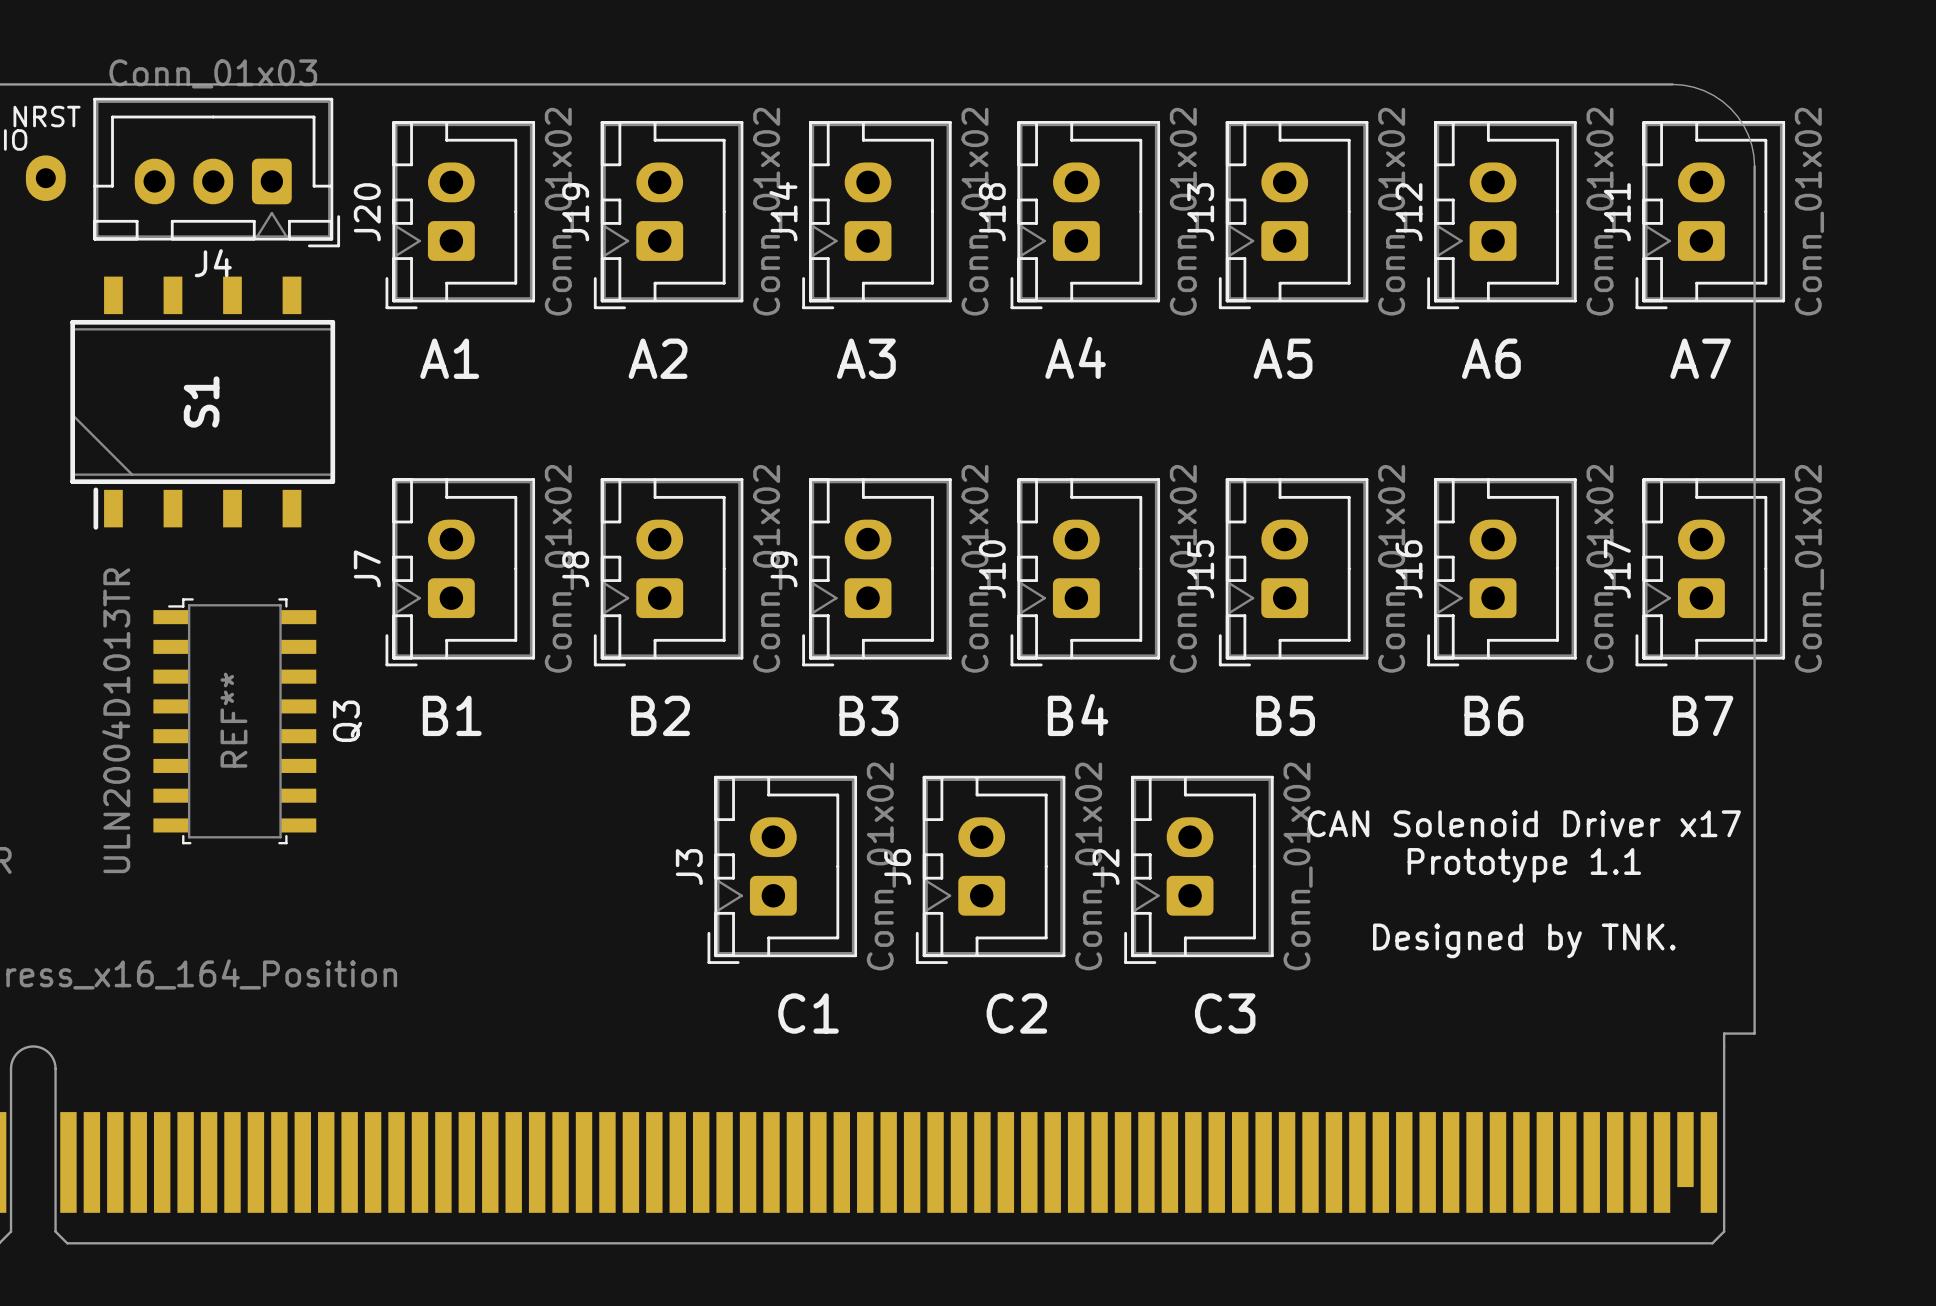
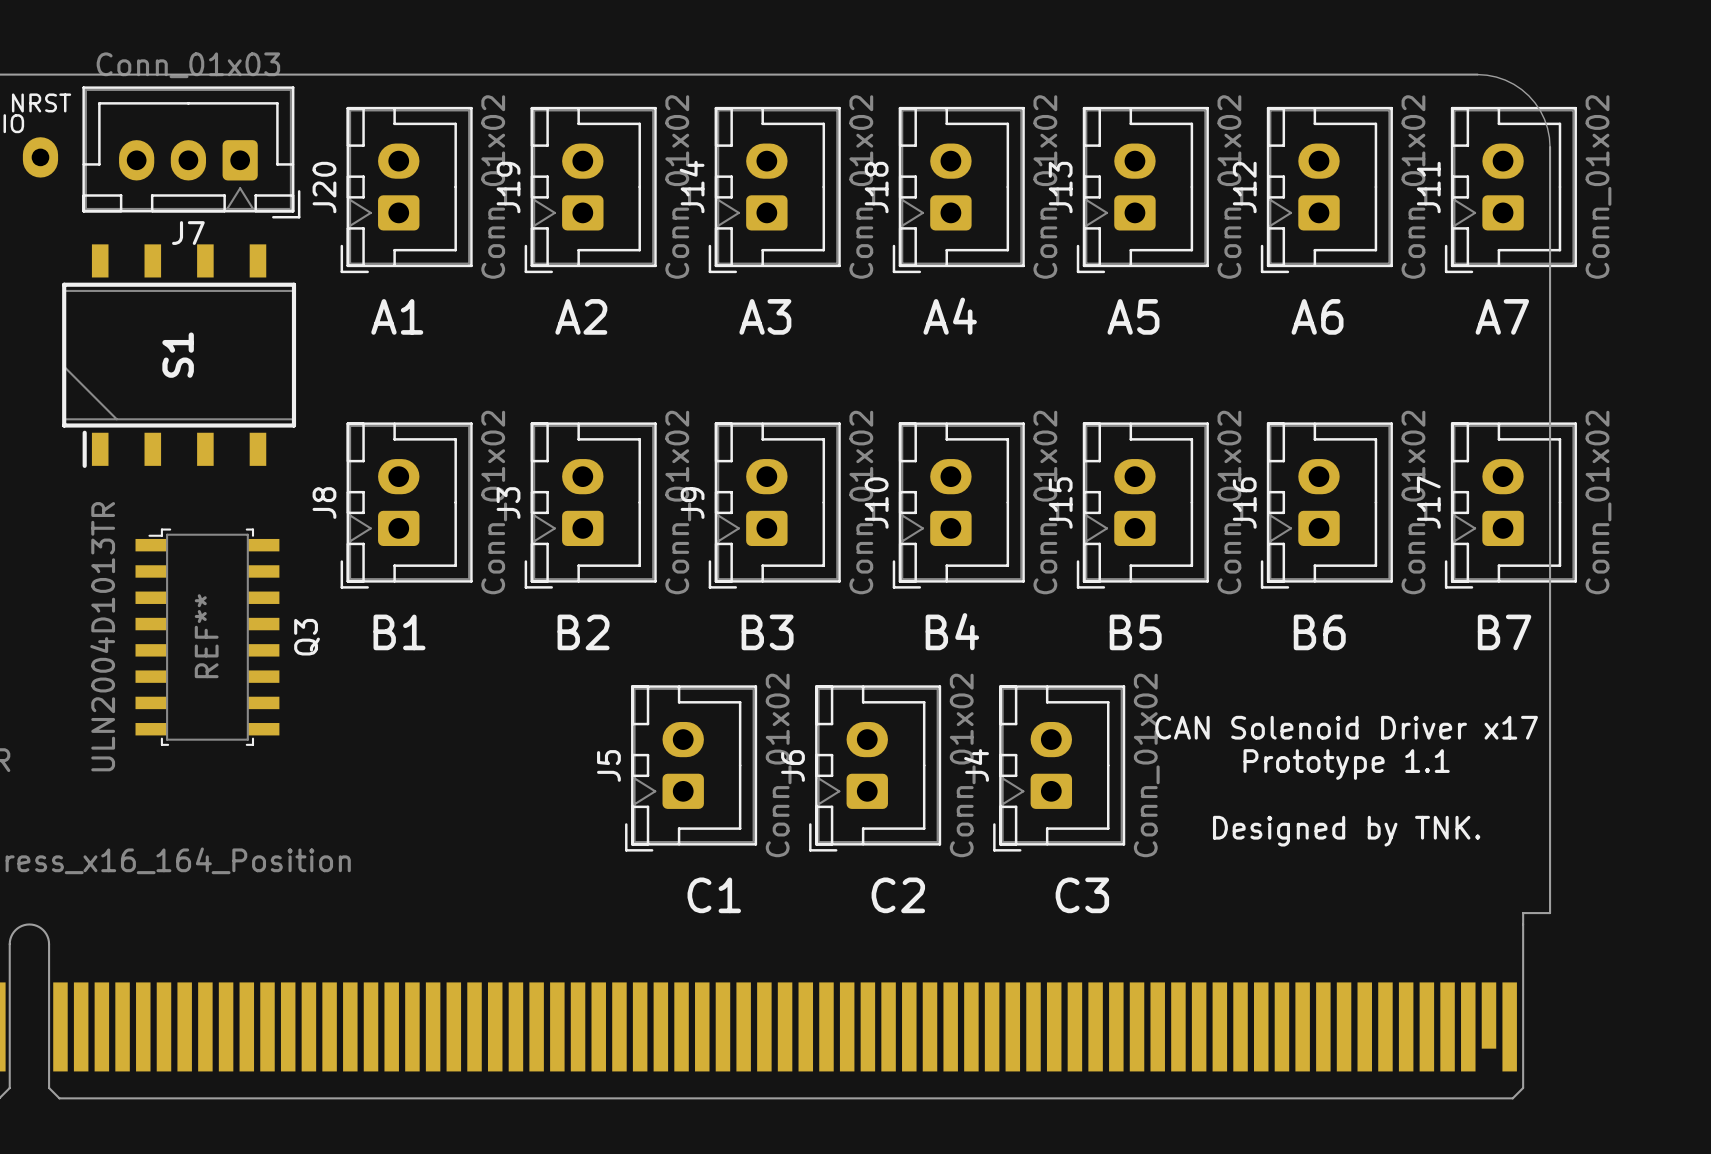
J4 name: J4 (213, 263) -> J7 (188, 233)
J7 name: J7 (367, 568) -> J8 (324, 503)
J8 name: J8 (575, 569) -> J3 (508, 503)
J3 name: J3 (689, 867) -> J5 (608, 765)
J2 name: J2 (1105, 867) -> J4 (976, 765)

